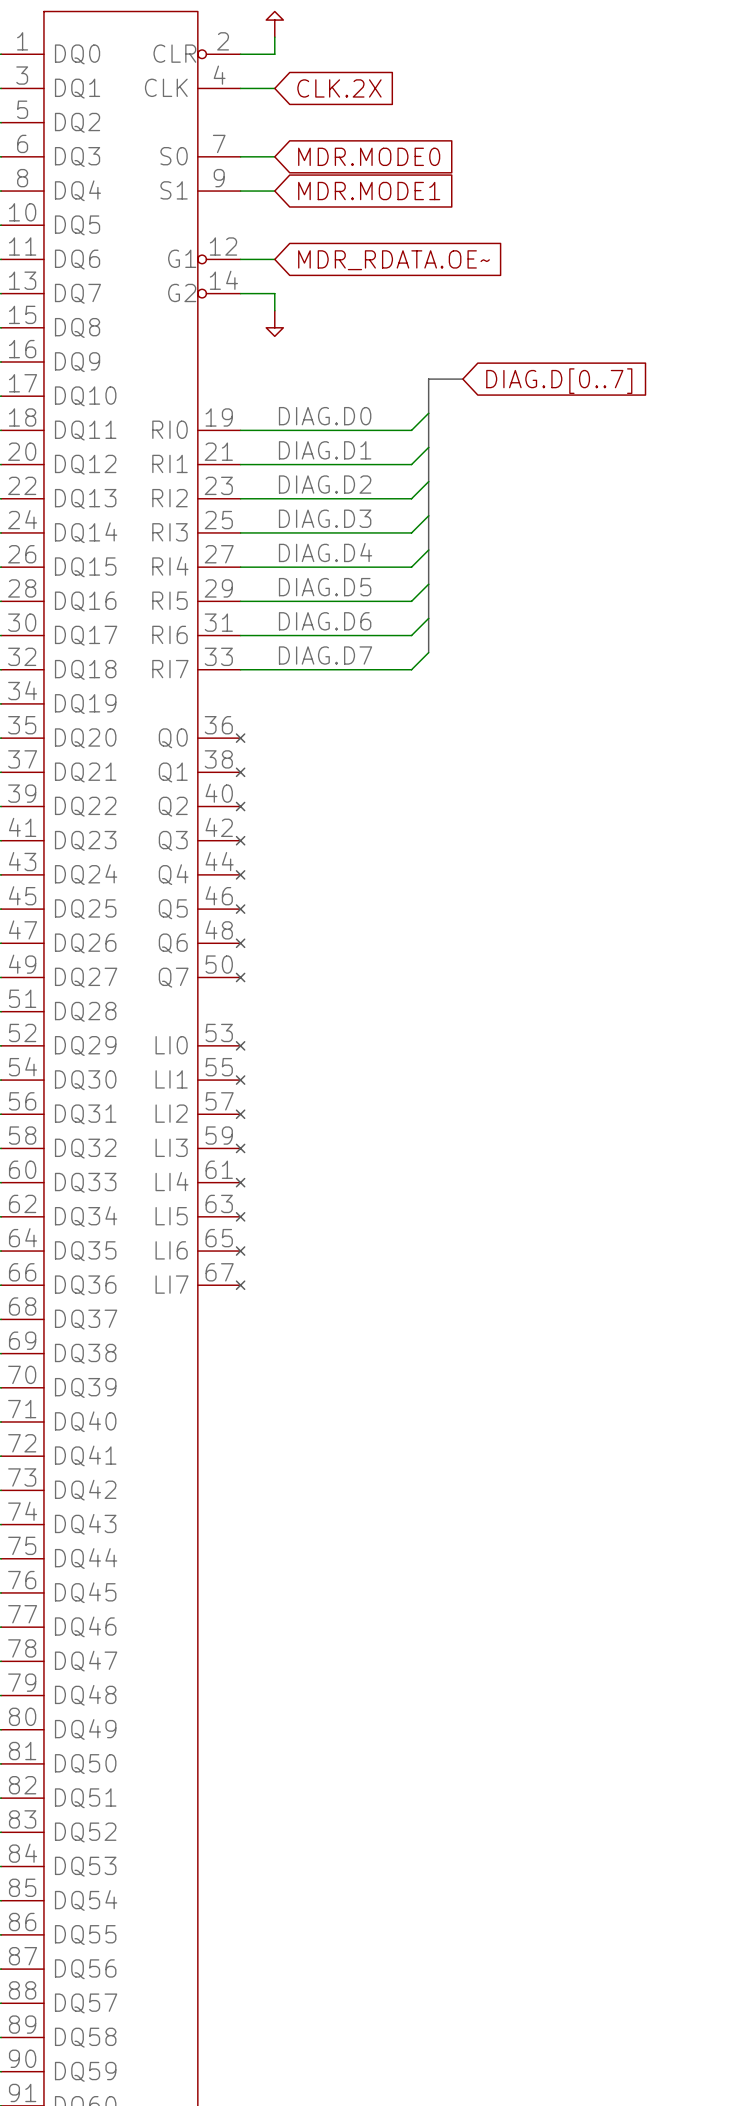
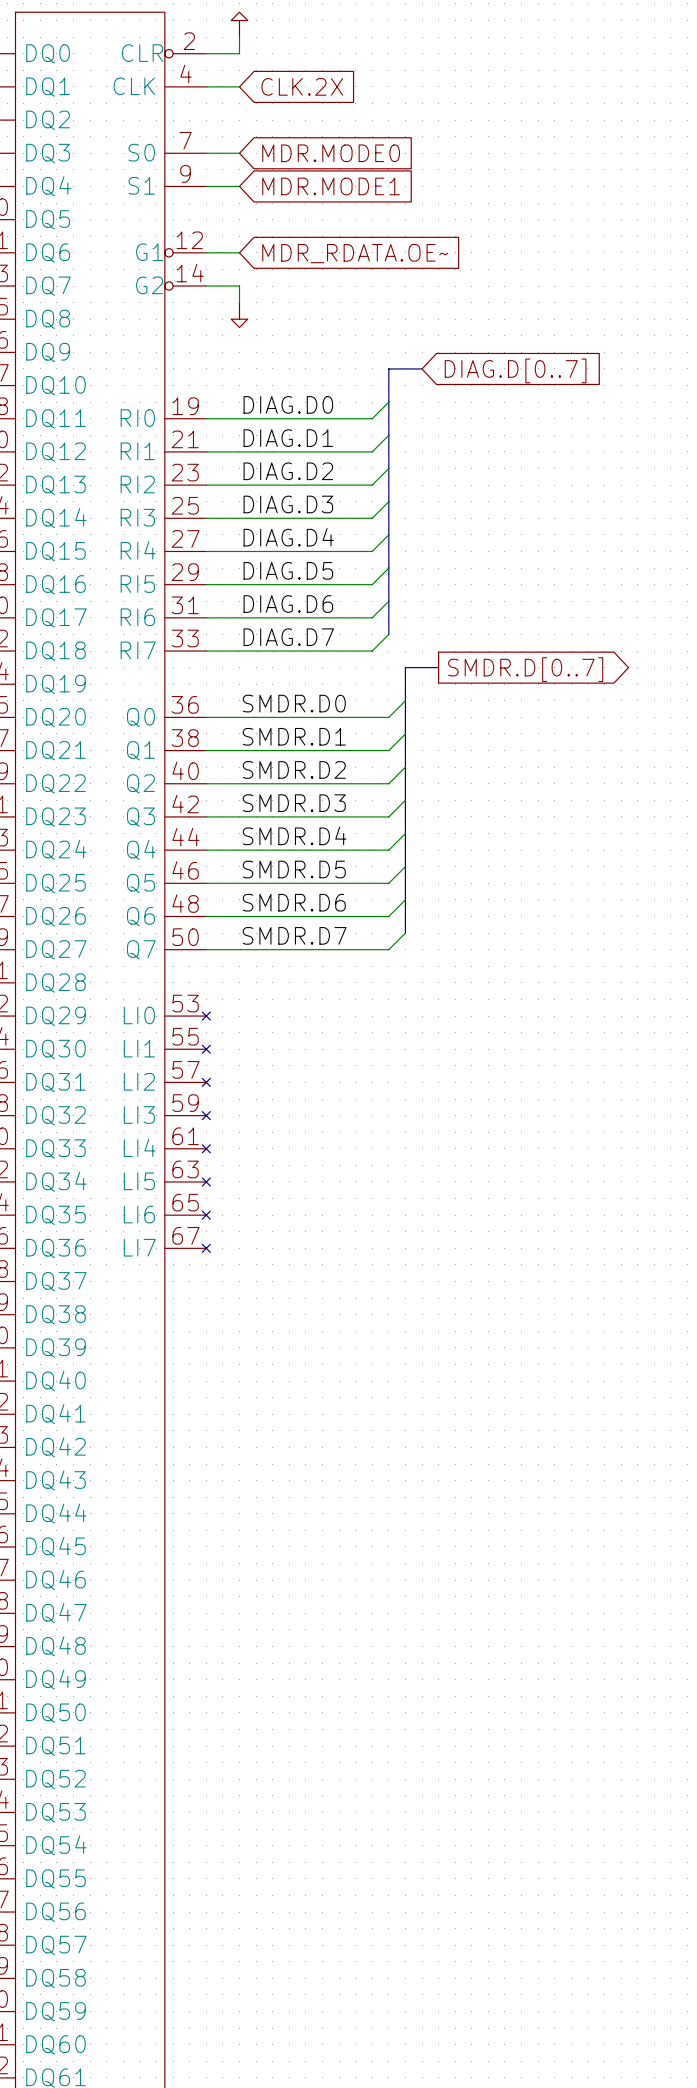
bus: none -> (438, 667) (405, 667) (405, 933)
global label: none -> SMDR.D[0..7] (525, 669)
wire: none -> (405, 700) (388, 717) (206, 717)
label: none -> SMDR.D0 (294, 703)
no-connect mark: (240, 738) -> none
wire: none -> (405, 733) (388, 750) (206, 750)
label: none -> SMDR.D1 (294, 736)
no-connect mark: (240, 772) -> none
wire: none -> (405, 767) (388, 783) (206, 783)
label: none -> SMDR.D2 (294, 769)
no-connect mark: (240, 806) -> none
wire: none -> (405, 800) (388, 816) (206, 816)
label: none -> SMDR.D3 (294, 803)
no-connect mark: (240, 840) -> none
wire: none -> (405, 833) (388, 850) (206, 850)
label: none -> SMDR.D4 (294, 835)
no-connect mark: (240, 874) -> none
wire: none -> (405, 866) (388, 883) (206, 883)
label: none -> SMDR.D5 (294, 869)
no-connect mark: (240, 909) -> none
wire: none -> (405, 899) (388, 916) (206, 916)
label: none -> SMDR.D6 (294, 902)
no-connect mark: (240, 943) -> none
wire: none -> (405, 933) (388, 949) (206, 949)
label: none -> SMDR.D7 (294, 935)
no-connect mark: (240, 977) -> none

